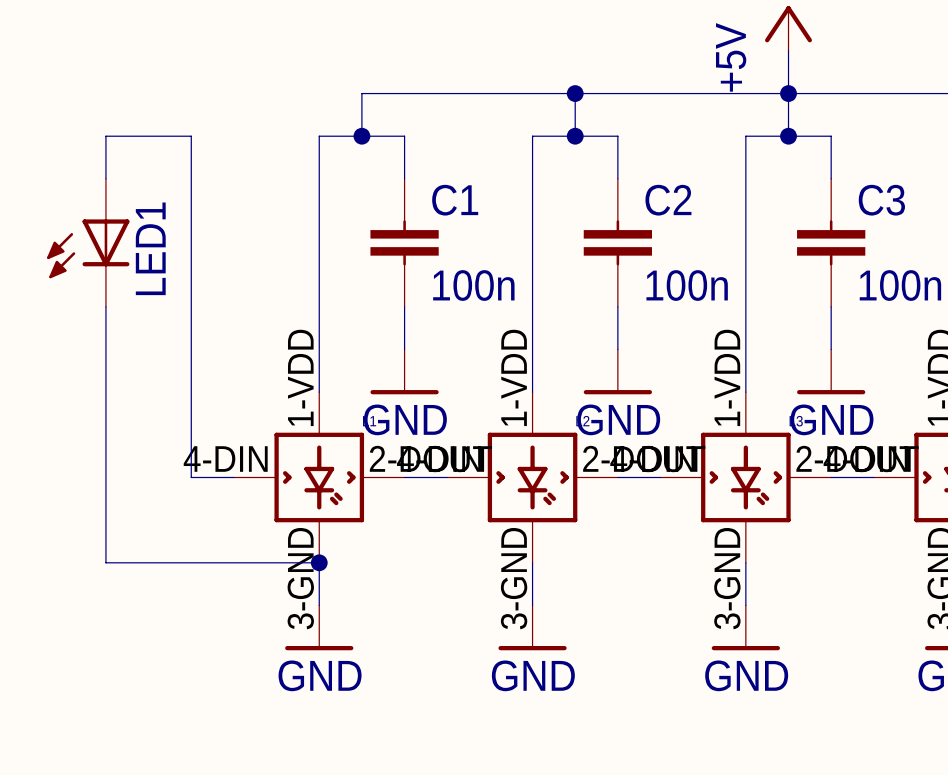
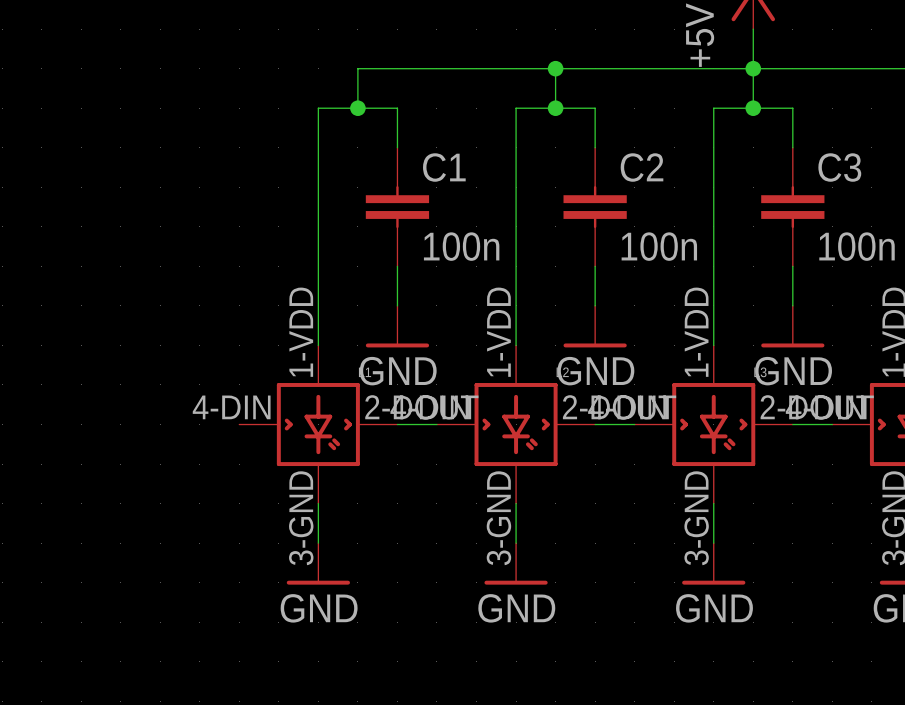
wire: (105, 178) (105, 136) (191, 136) (191, 477) (233, 477) -> none
LED1: (88, 242) -> none
wire: (105, 306) (105, 562) (319, 562) -> none
junction: (319, 562) -> none

